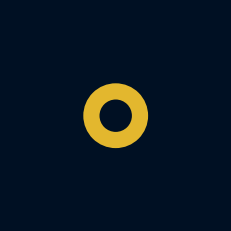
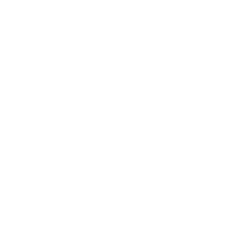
part: (115, 115) -> none

